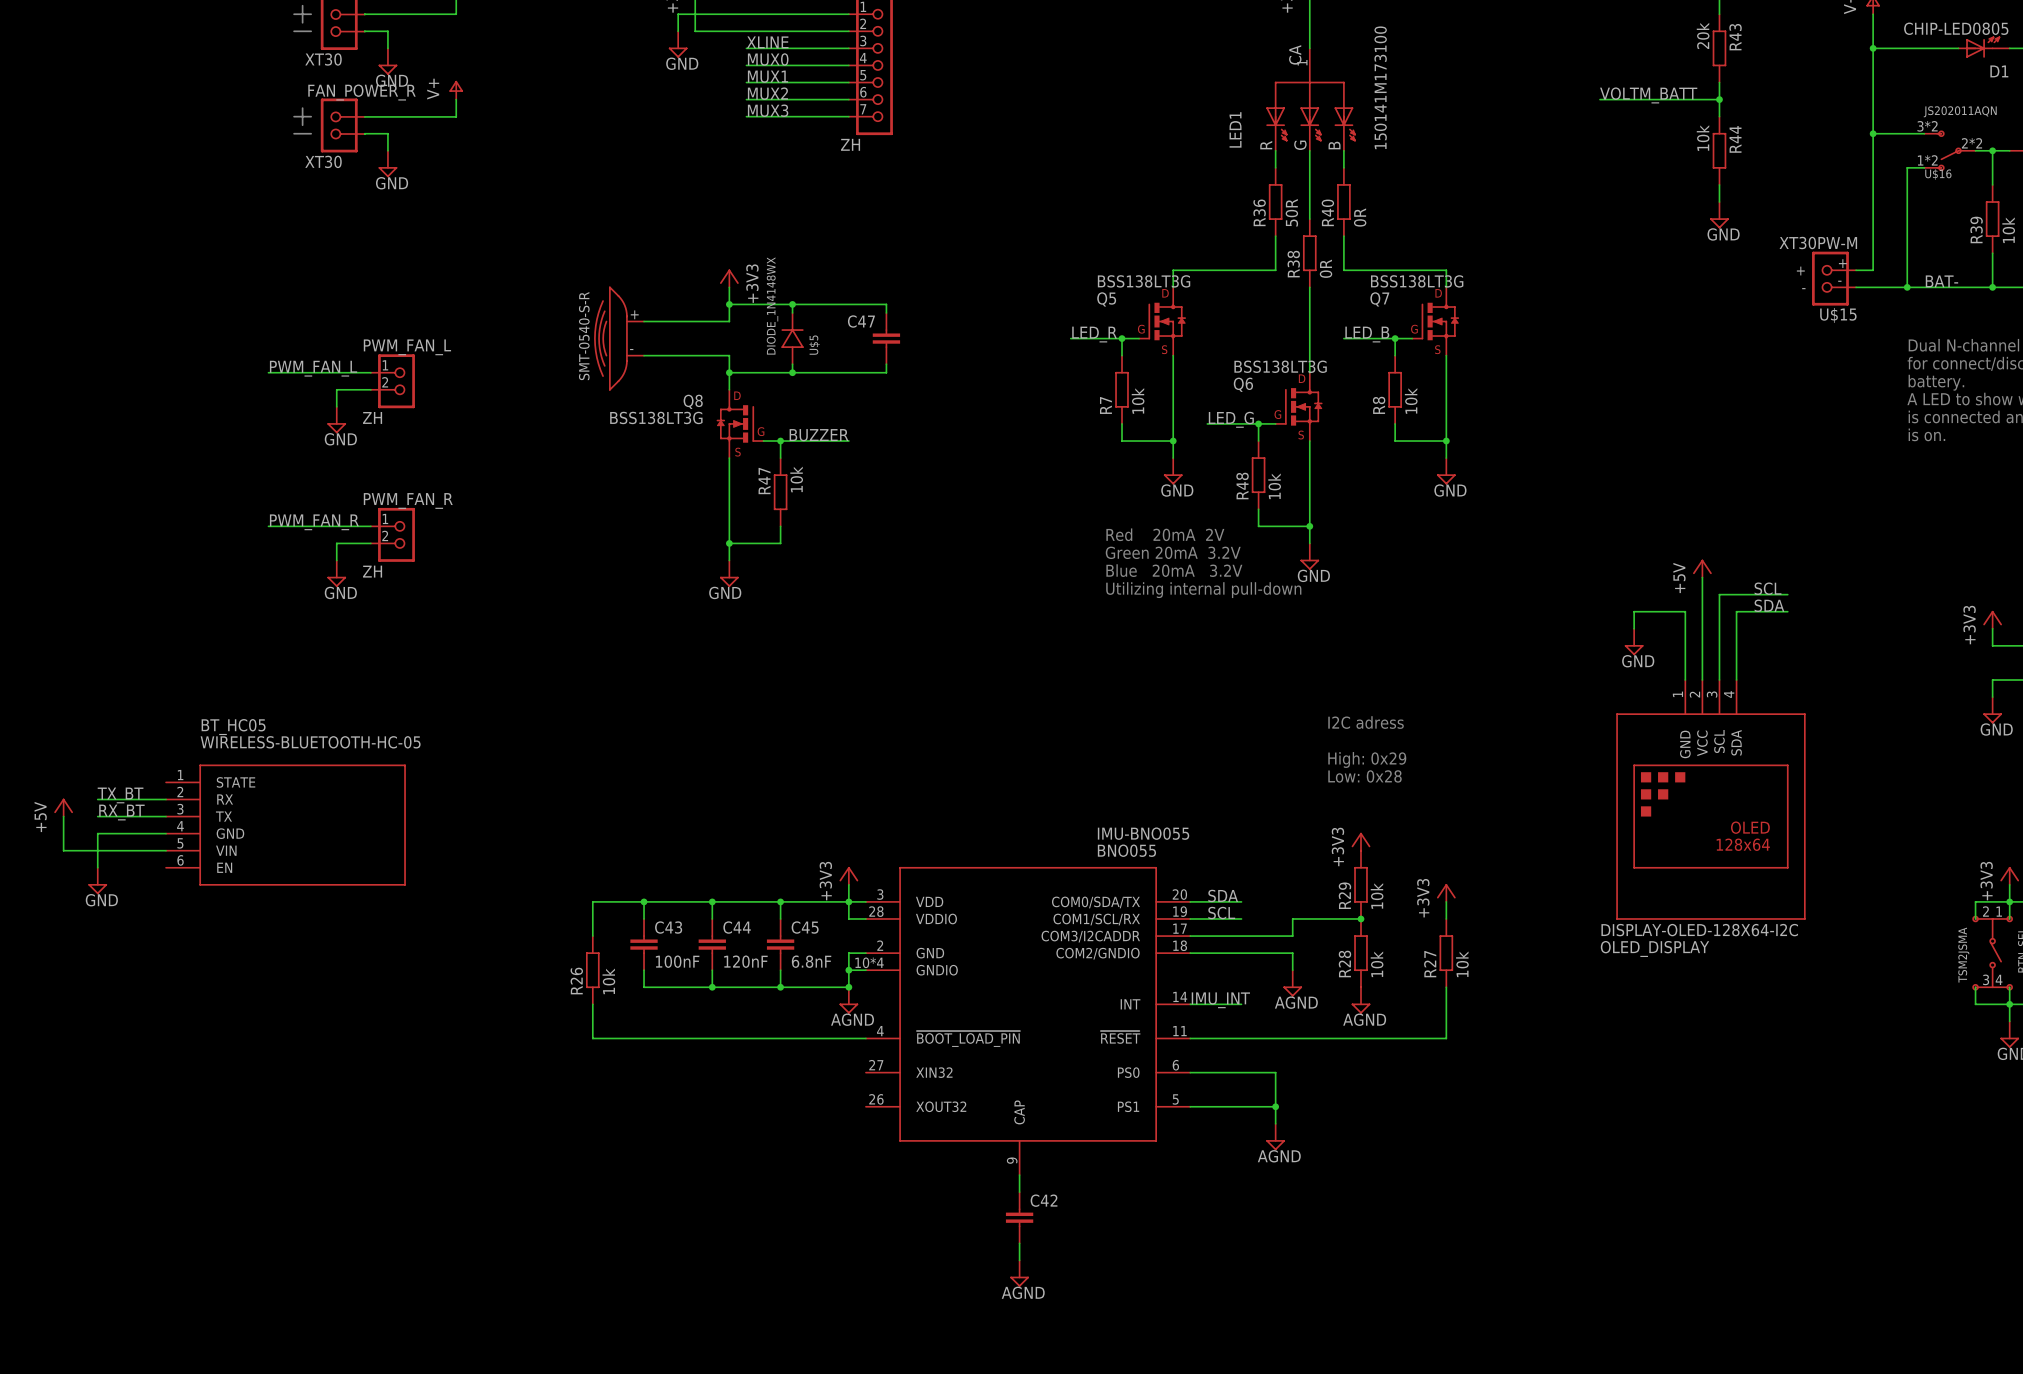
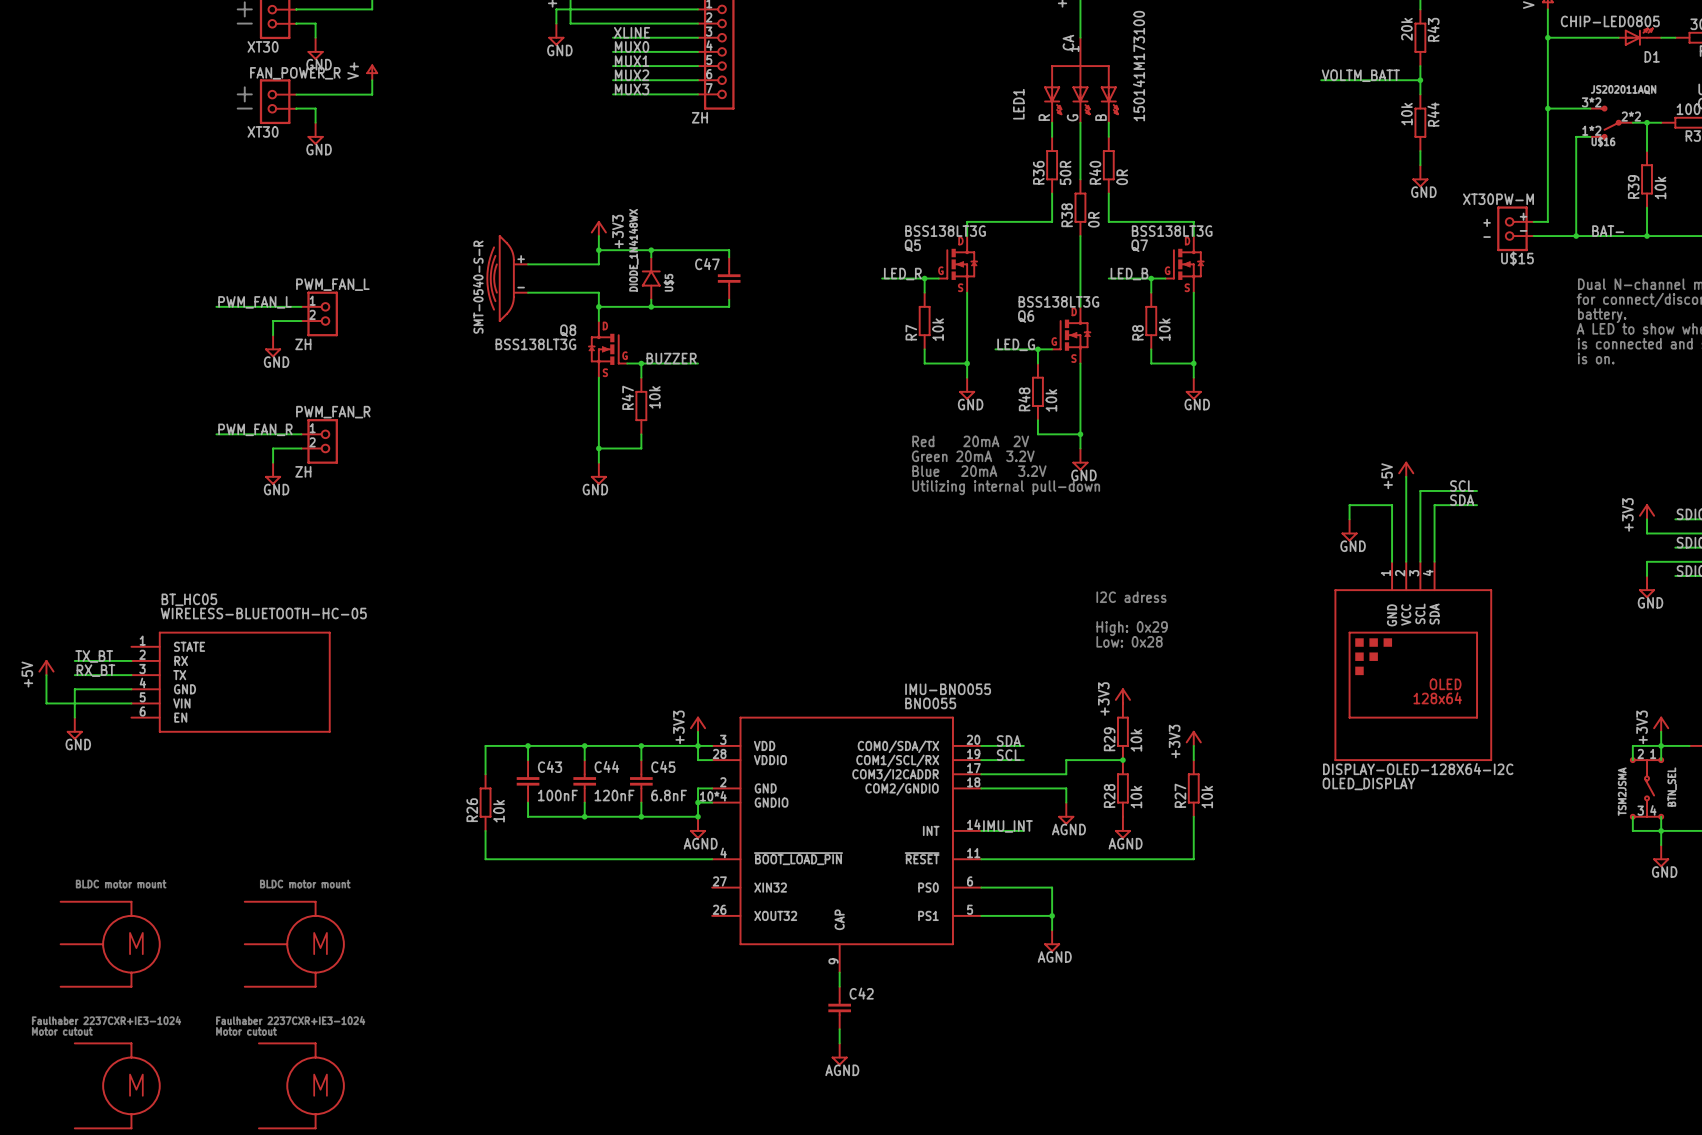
part: none -> (110, 944)
part: none -> (294, 944)
part: none -> (117, 1085)
part: none -> (301, 1085)

